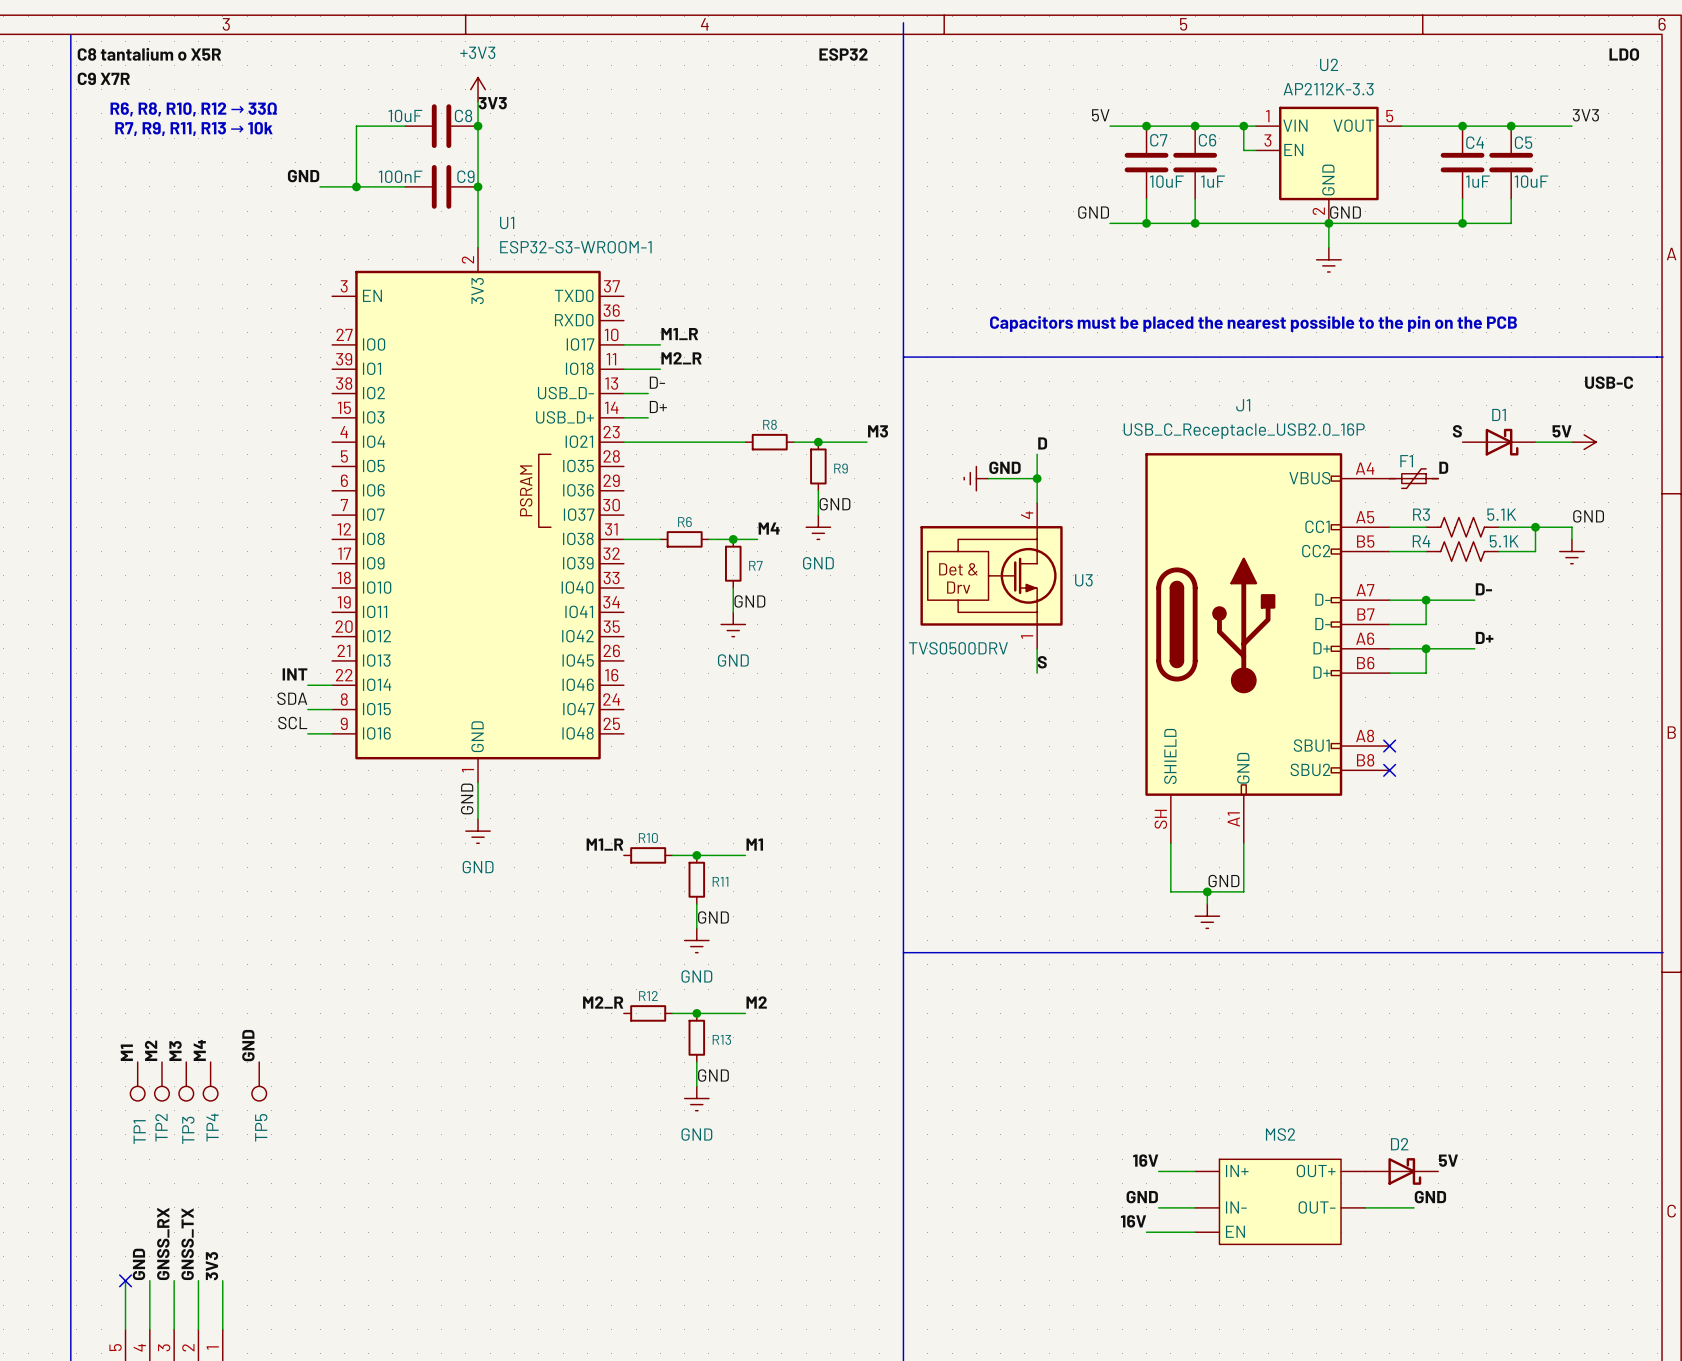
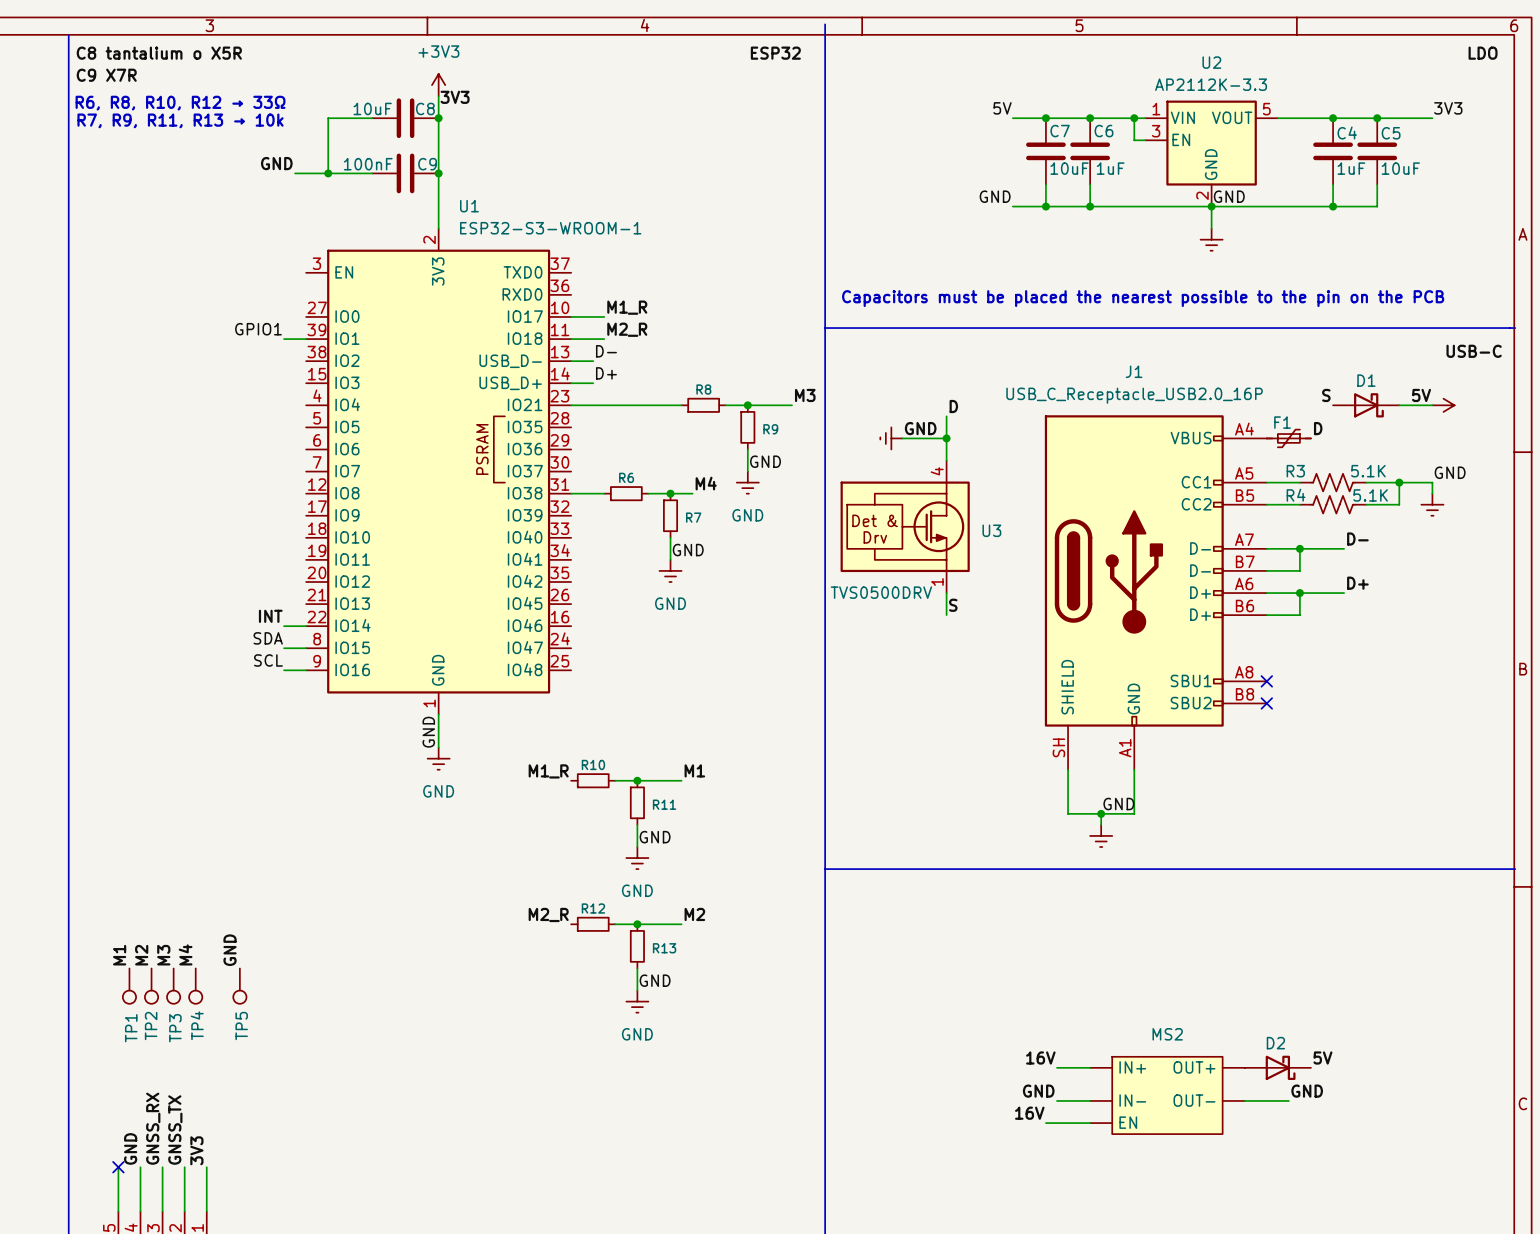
label: none -> GPIO1 (258, 329)
wire: none -> (284, 339) (306, 339)

